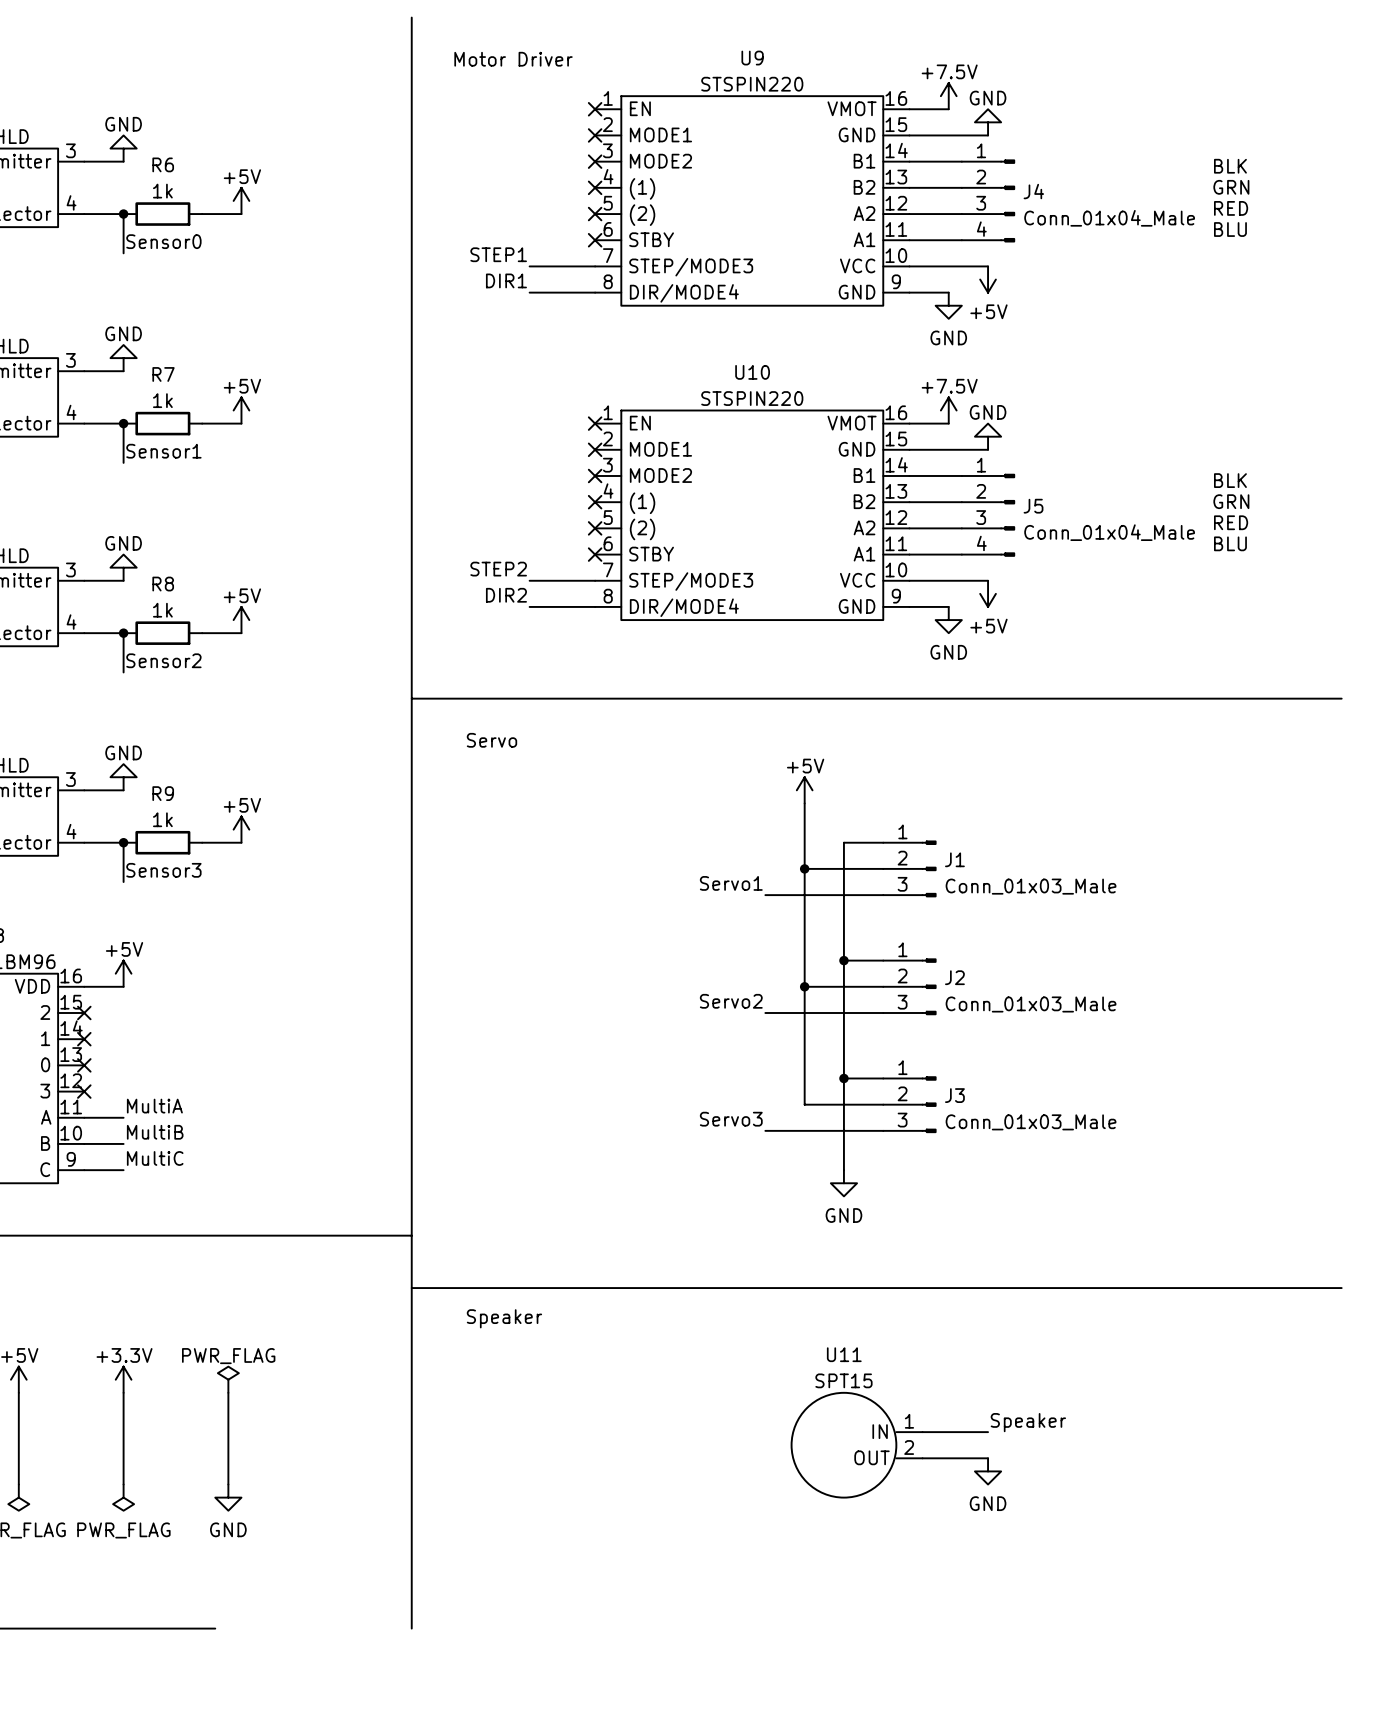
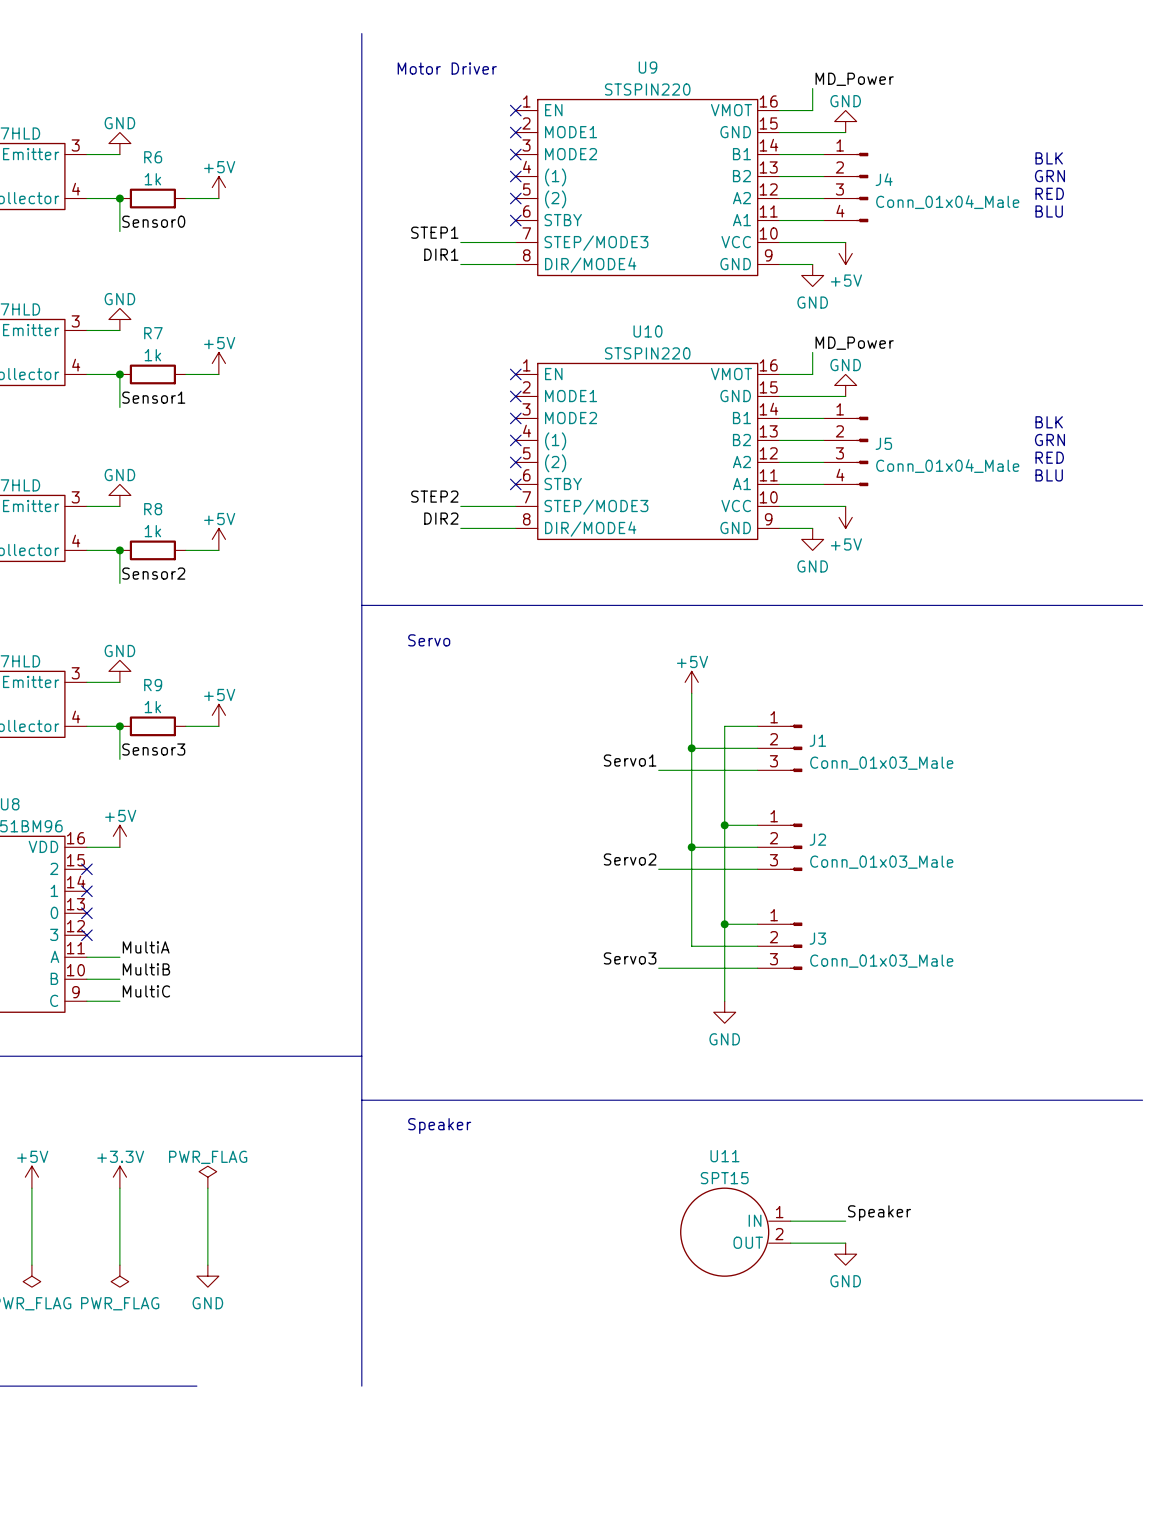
label: none -> MD_Power (854, 79)
power symbol: +7.5V (948, 96) -> none
label: none -> MD_Power (854, 343)
power symbol: +7.5V (948, 410) -> none

